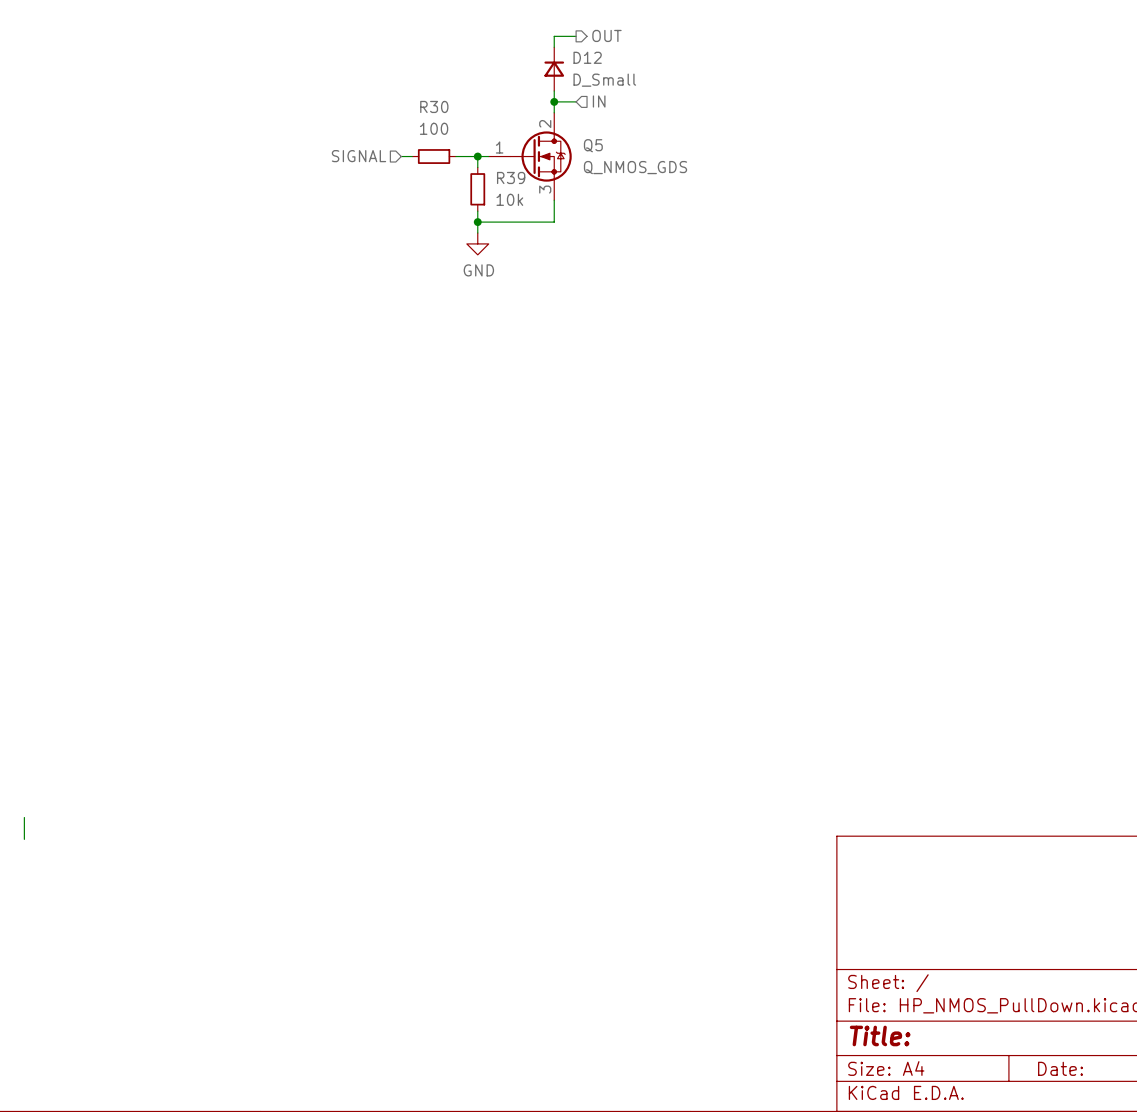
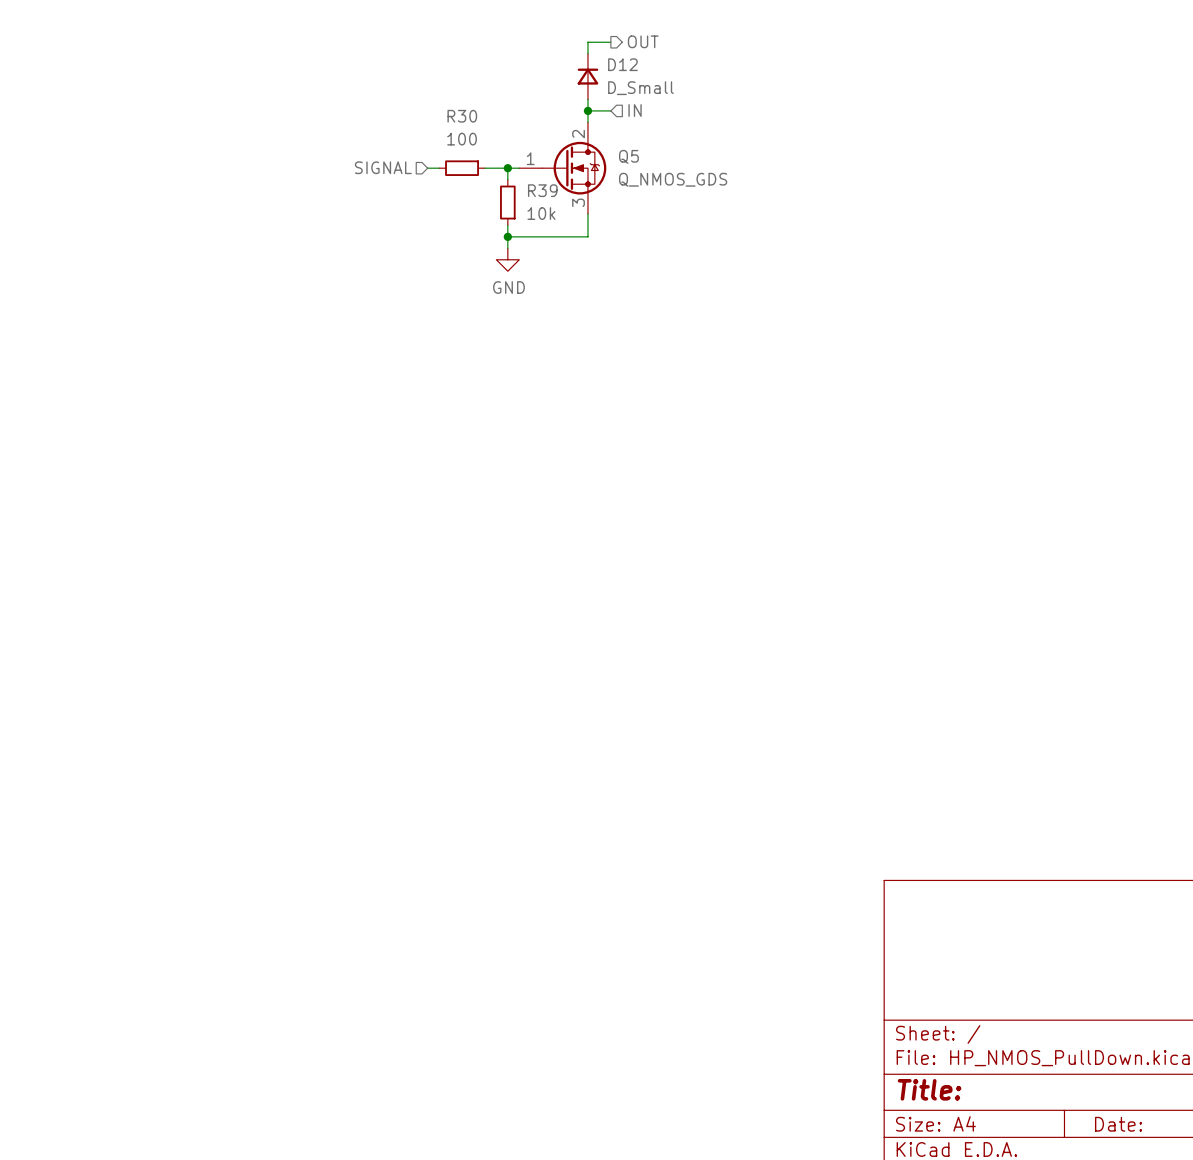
wire: (24, 817) (24, 839) -> none

